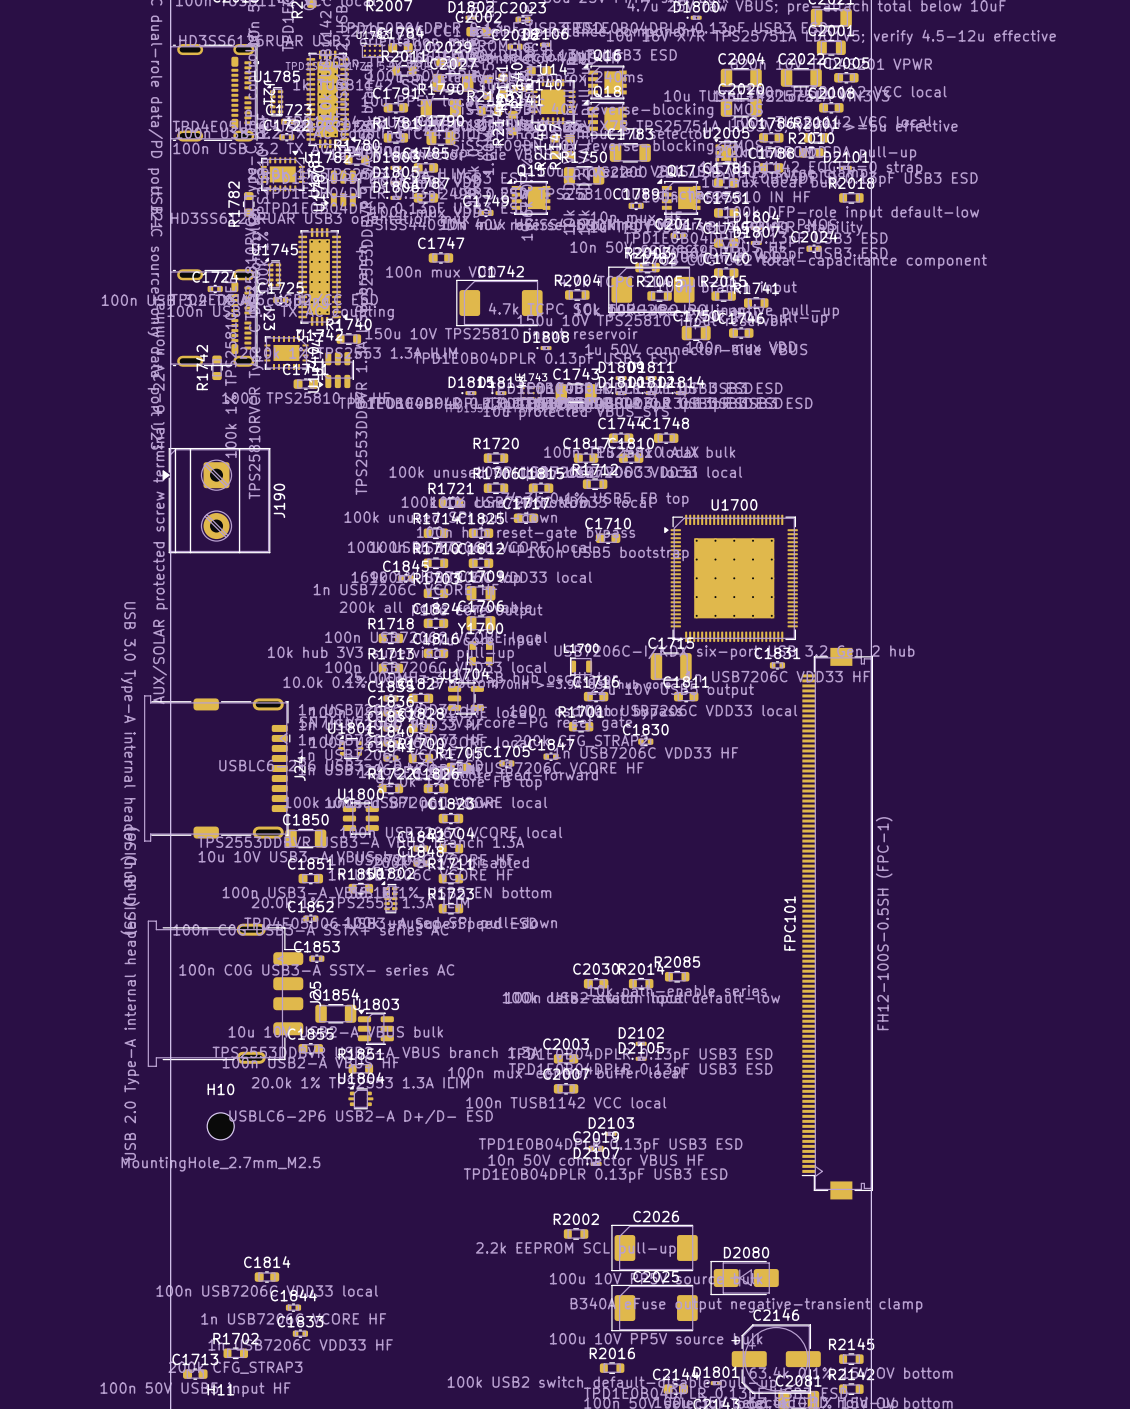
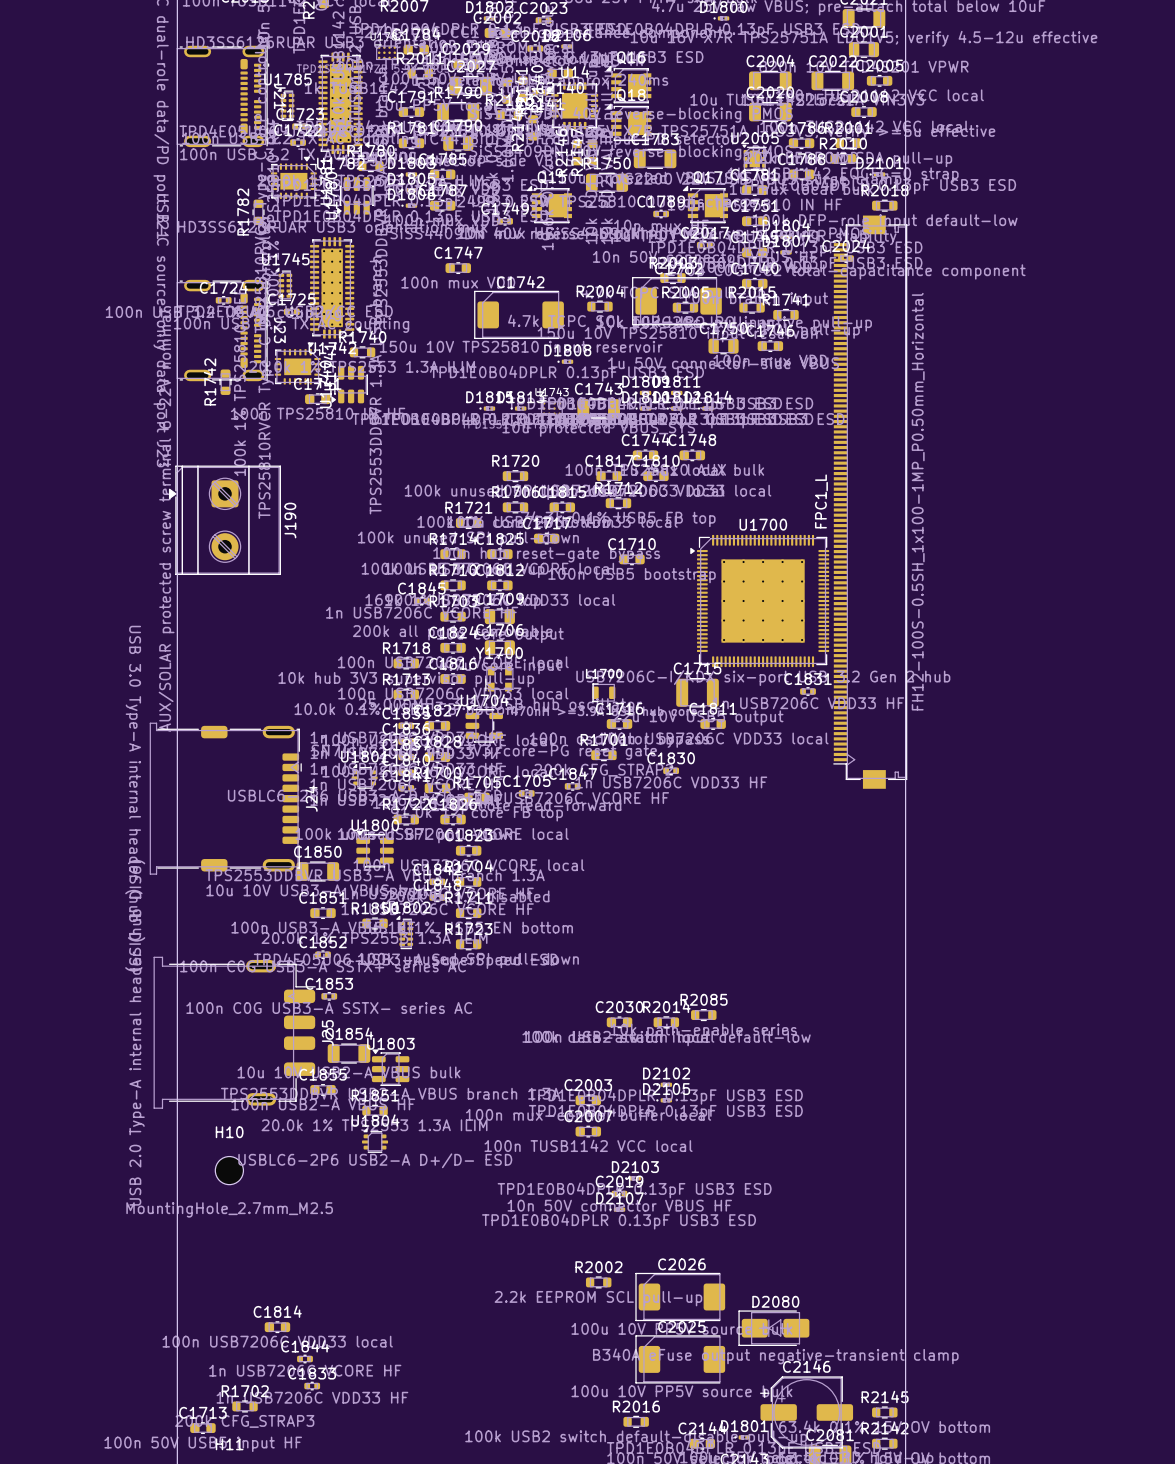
FPC1_L: none -> FH12-100S-0.5SH_1x100-1MP_P0.50mm_Horizontal (870, 502)
FPC101: FH12-100S-0.5SH (FPC-1) (837, 923) -> none

